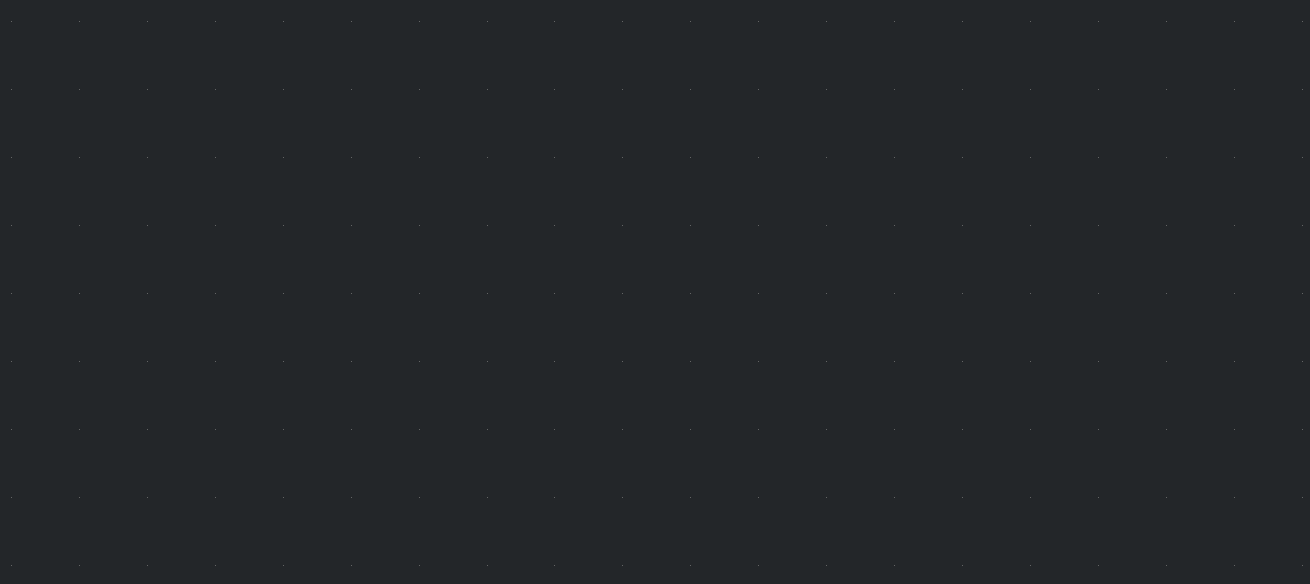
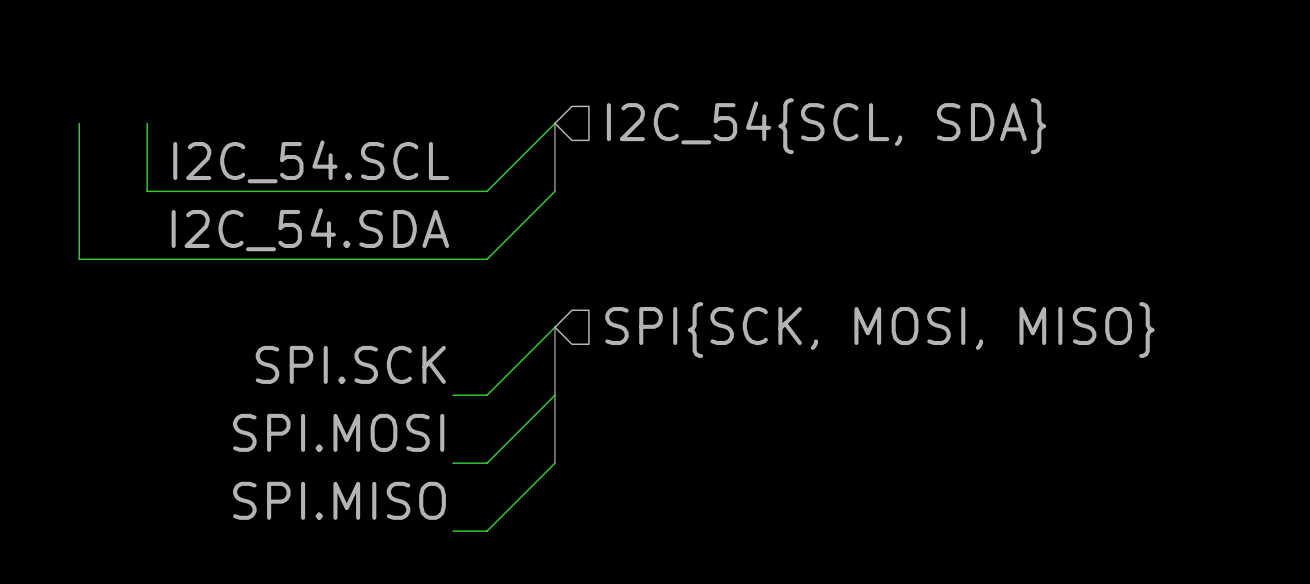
wire: none -> (79, 123) (79, 259) (487, 259) (554, 191)
wire: none -> (147, 123) (147, 191) (487, 191) (554, 123)
bus: none -> (554, 123) (554, 191)
hierarchical label: none -> I2C_54{SCL, SDA} (826, 126)
label: none -> I2C_54.SCL (311, 161)
label: none -> I2C_54.SDA (310, 229)
wire: none -> (554, 327) (487, 395) (453, 395)
bus: none -> (554, 327) (554, 463)
hierarchical label: none -> SPI{SCK, MOSI, MISO} (879, 330)
label: none -> SPI.SCK (350, 364)
wire: none -> (554, 395) (487, 463) (453, 463)
label: none -> SPI.MOSI (338, 432)
wire: none -> (554, 463) (487, 531) (453, 531)
label: none -> SPI.MISO (339, 500)

